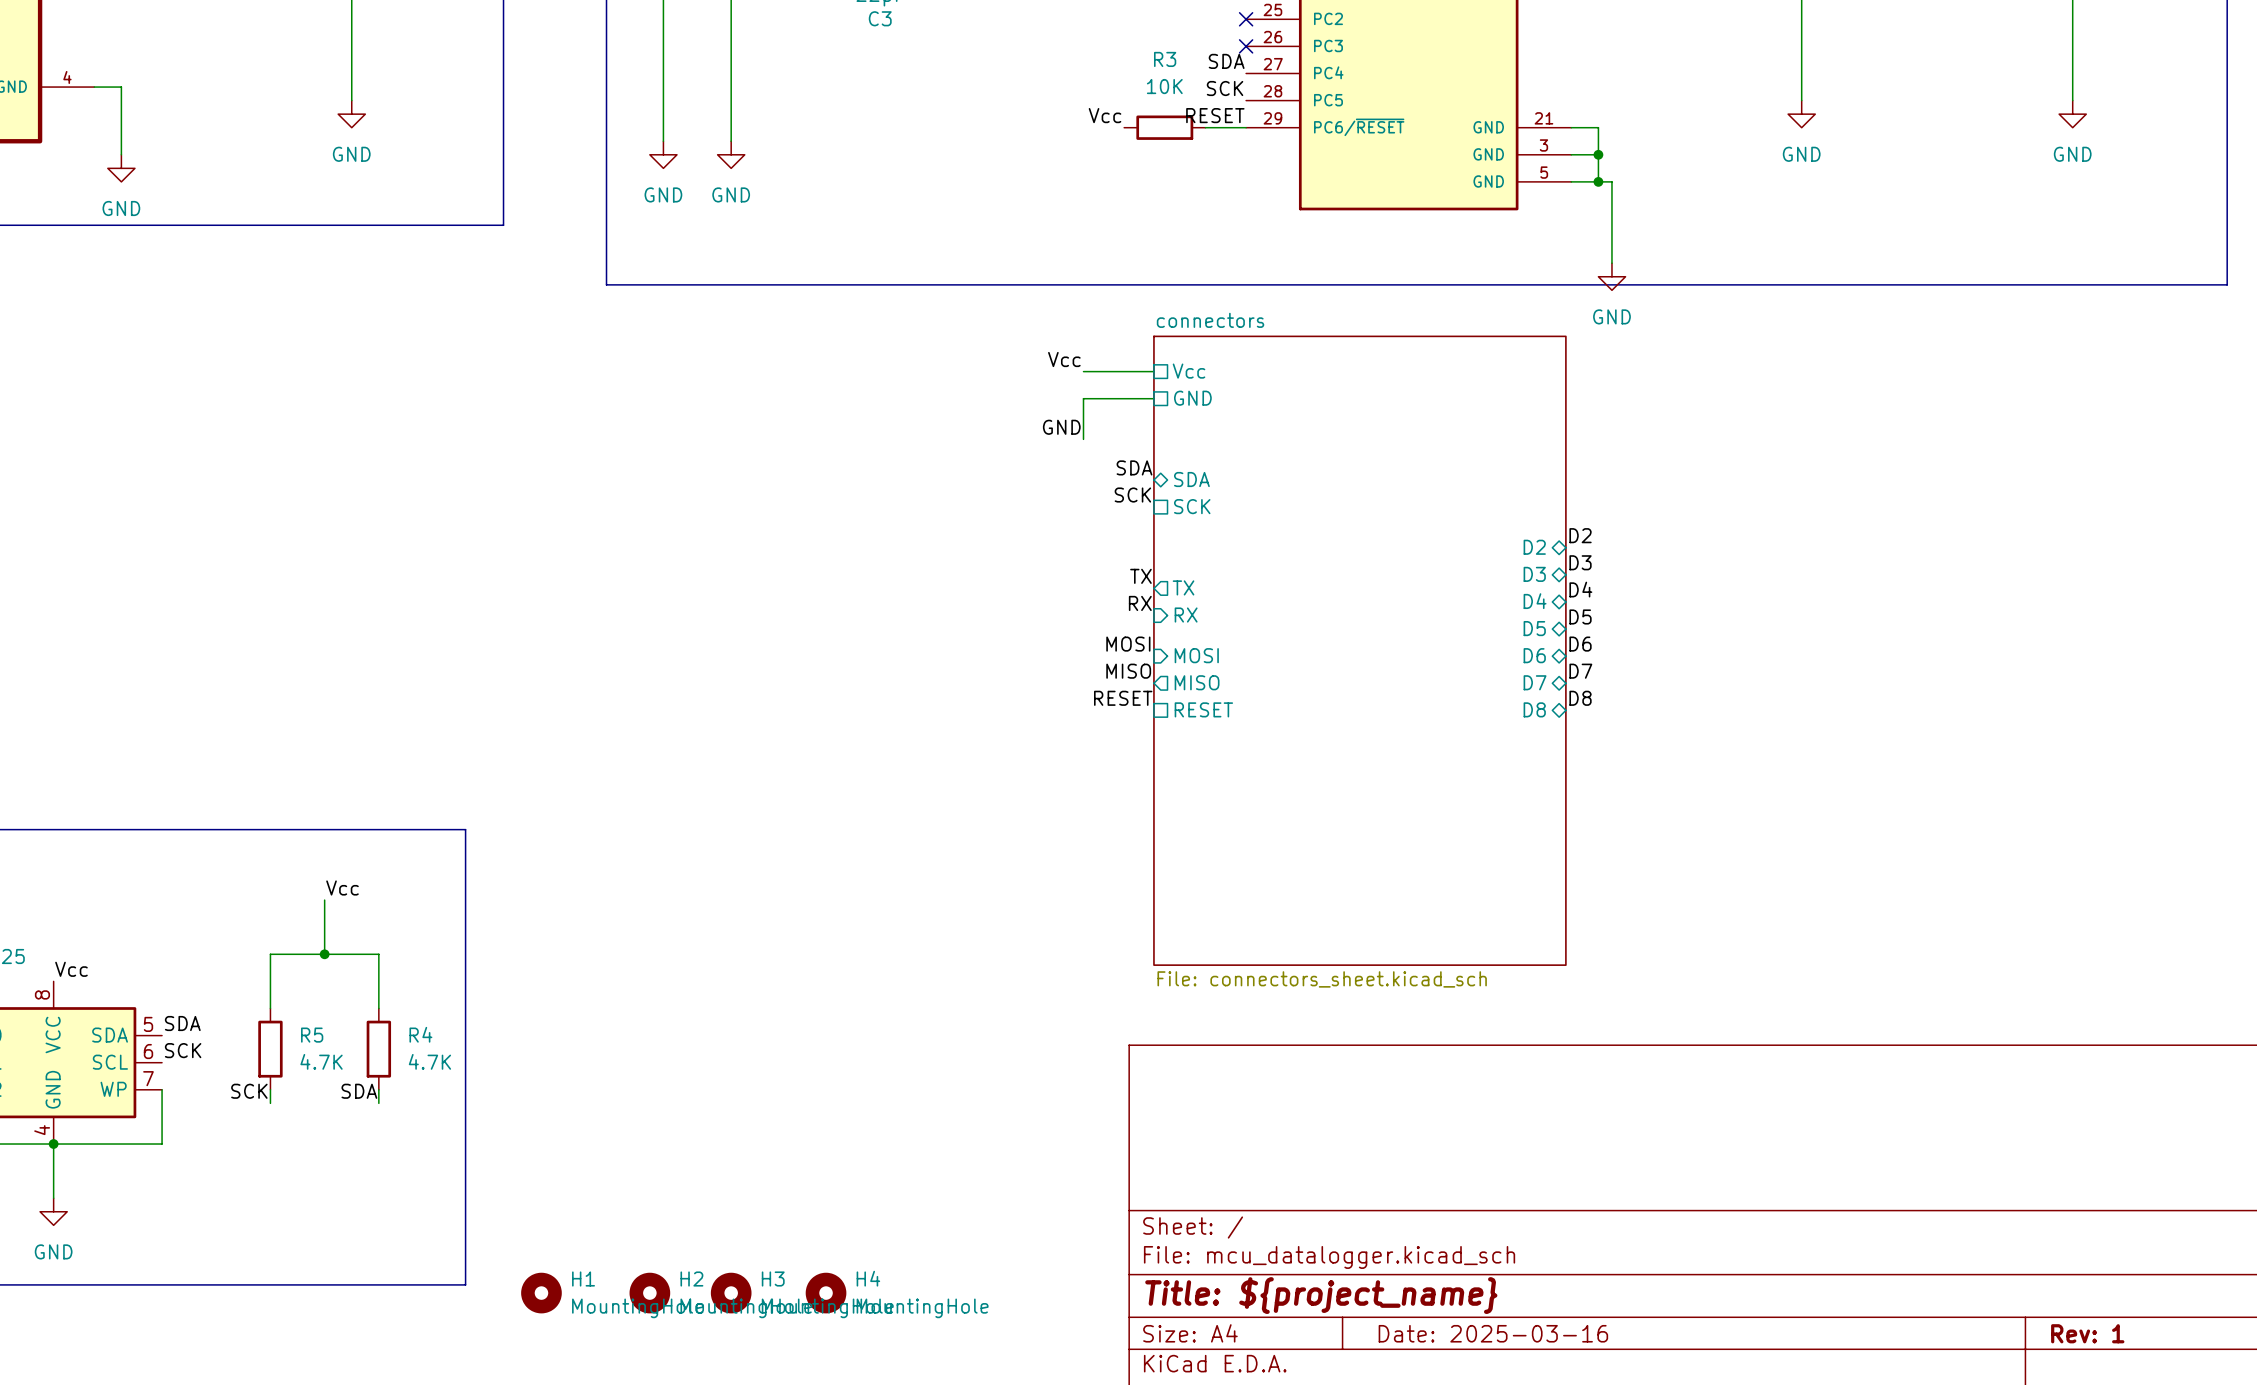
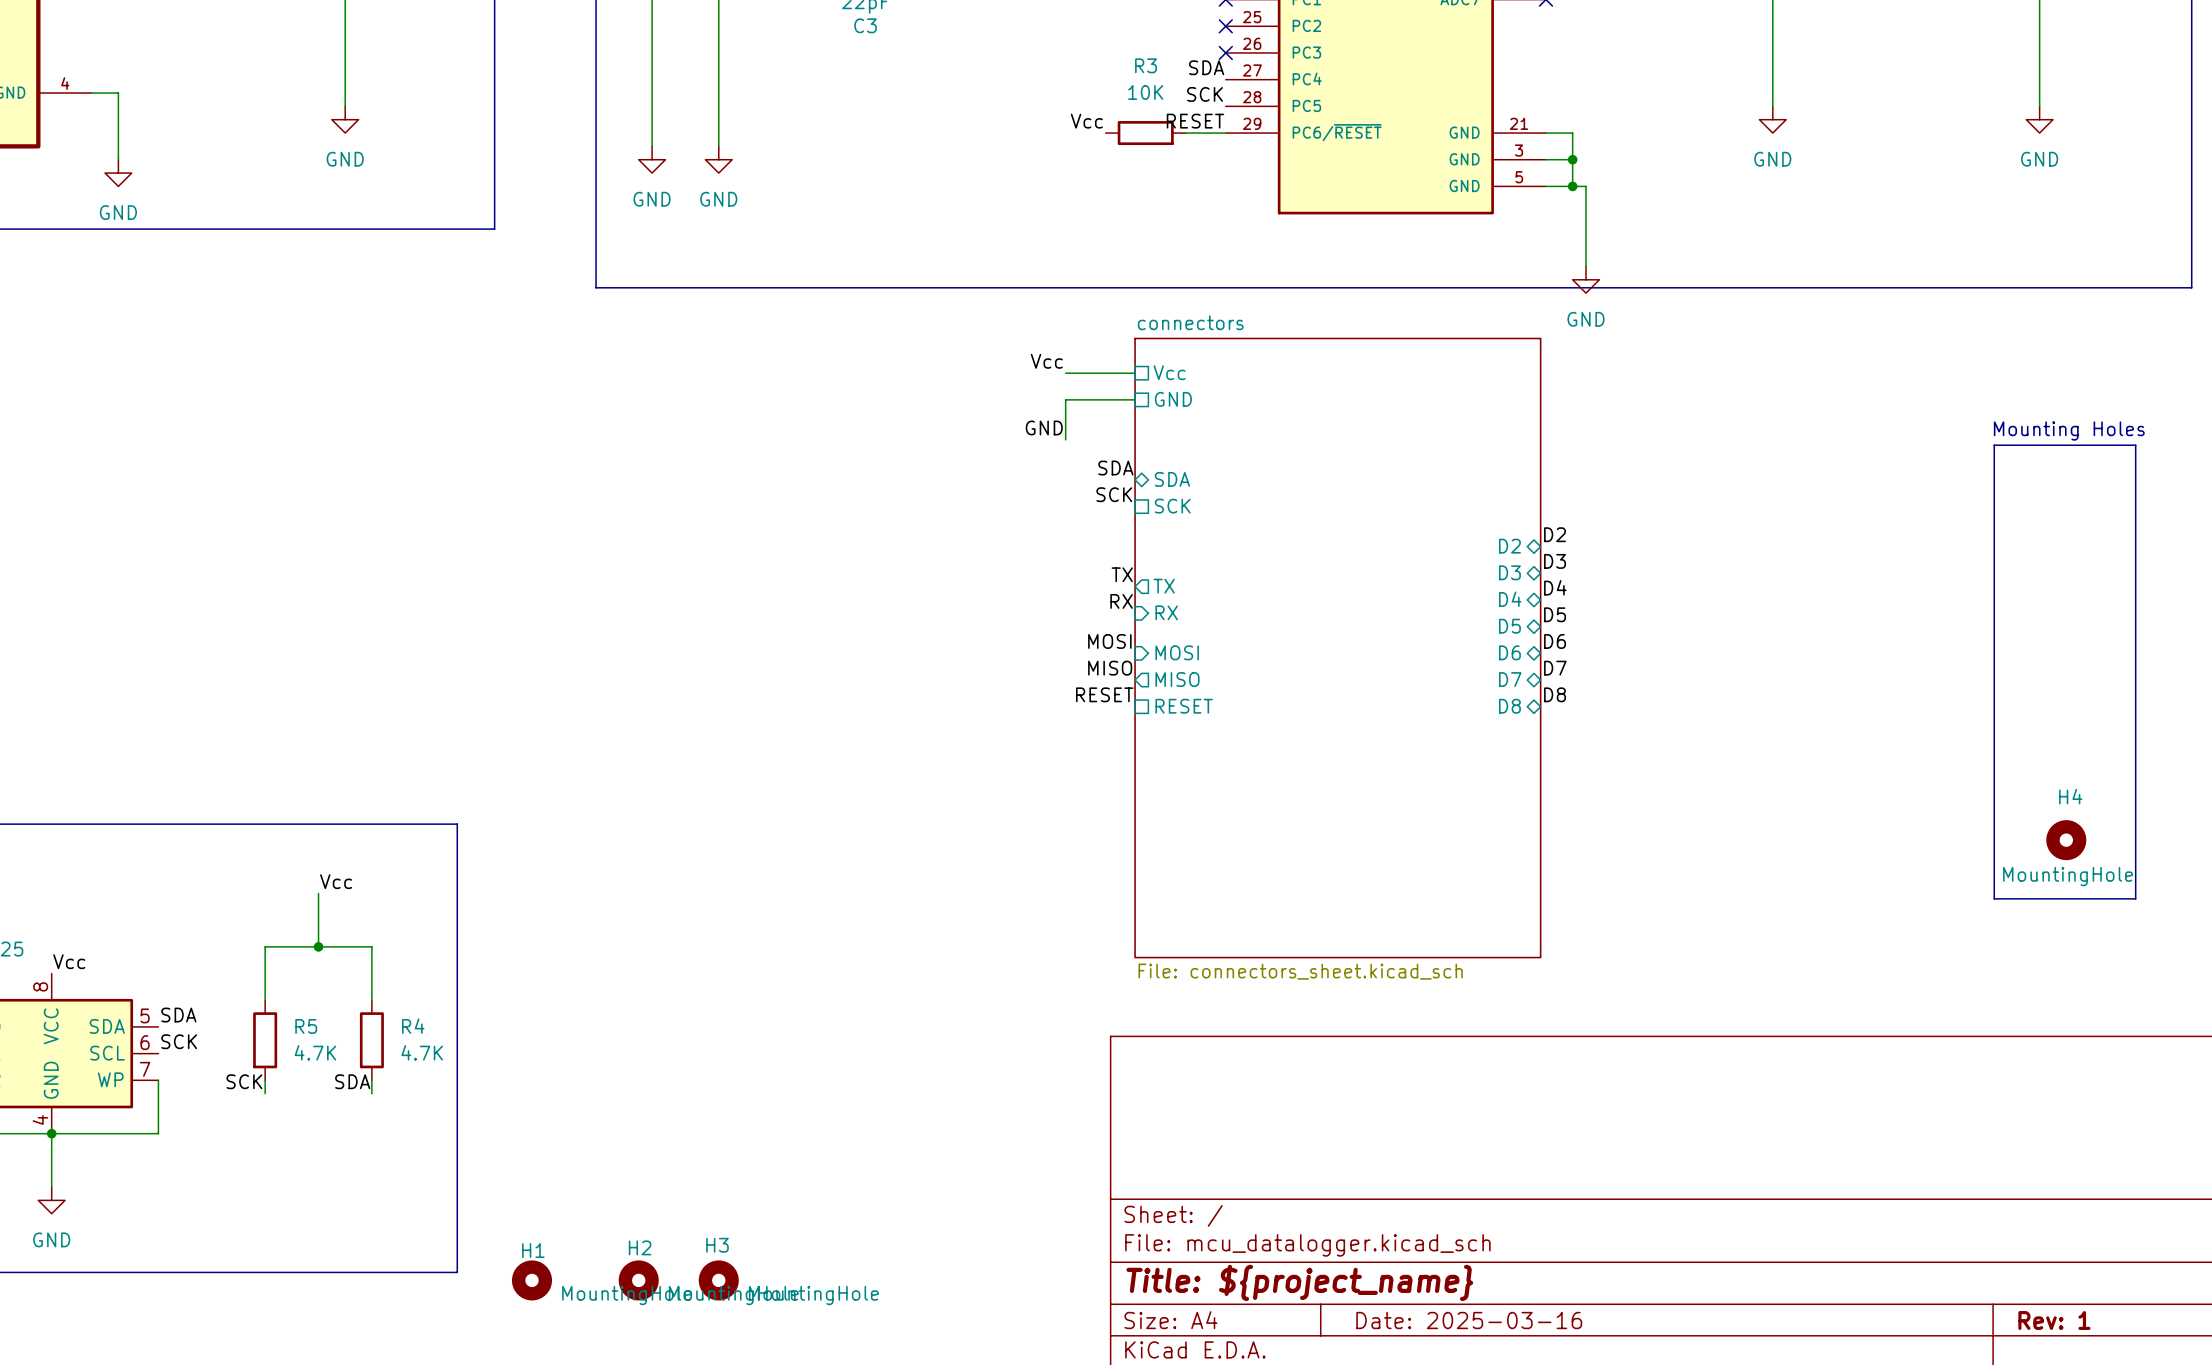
text: none -> Mounting Holes (2069, 430)
line: none -> (1994, 445) (2135, 445) (2135, 898) (1994, 898) (1994, 445)
H4 name position: H4 (868, 1278) -> H4 (2070, 796)
H1 name position: H1 (583, 1279) -> H1 (533, 1250)
H2 name position: H2 (691, 1279) -> H2 (640, 1247)
H3 name position: H3 (773, 1279) -> H3 (717, 1245)
H4 position: (826, 1293) -> (2066, 840)
H4 value position: MountingHole (922, 1308) -> MountingHole (2067, 876)

